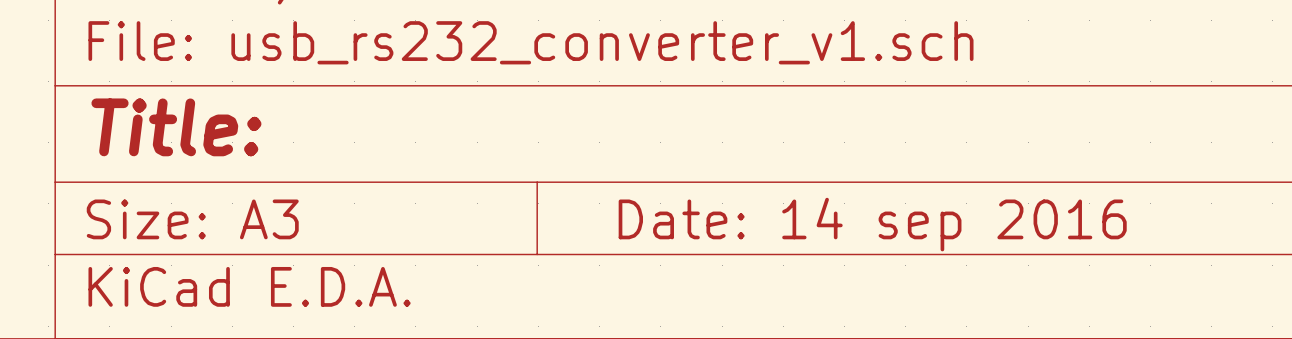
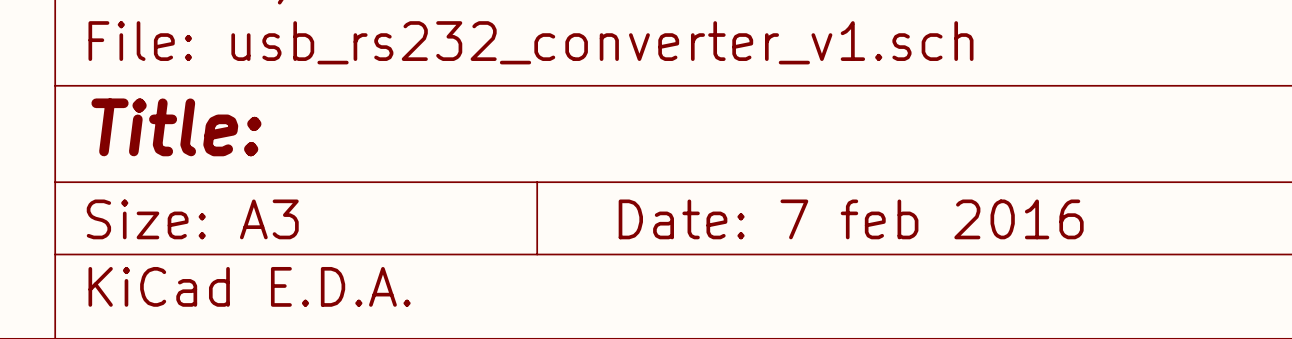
title block: Date: 14 sep 2016 (872, 224) -> Date: 7 feb 2016 (851, 219)

